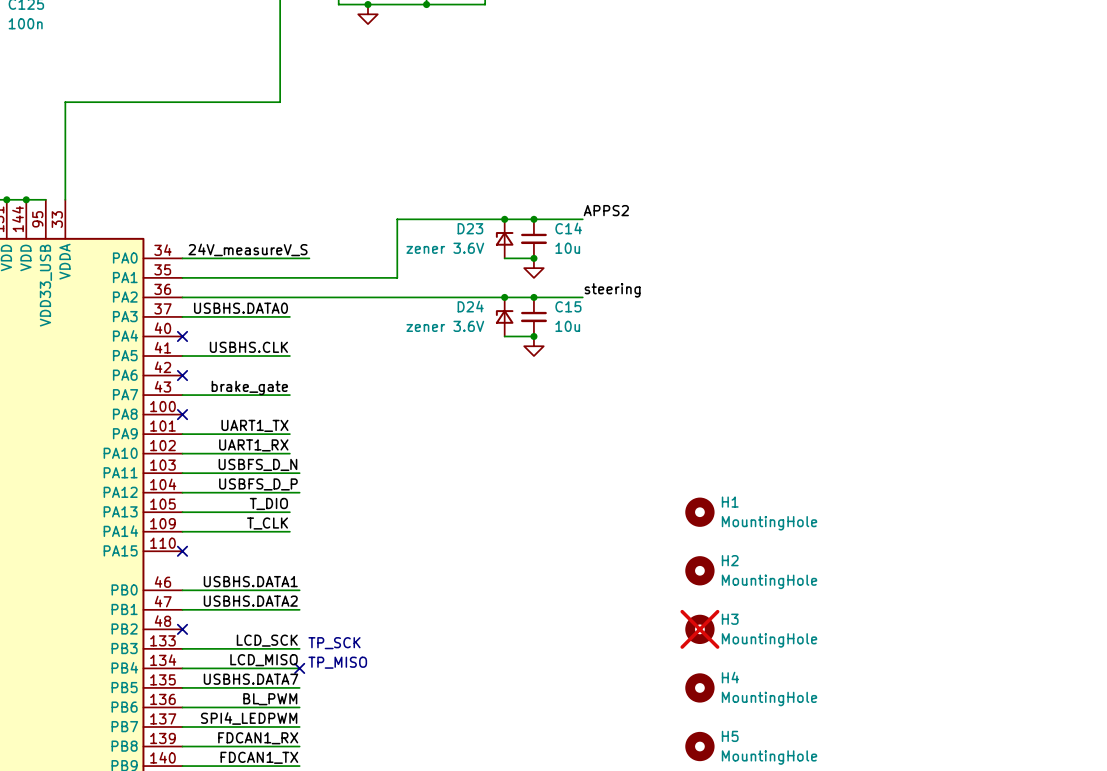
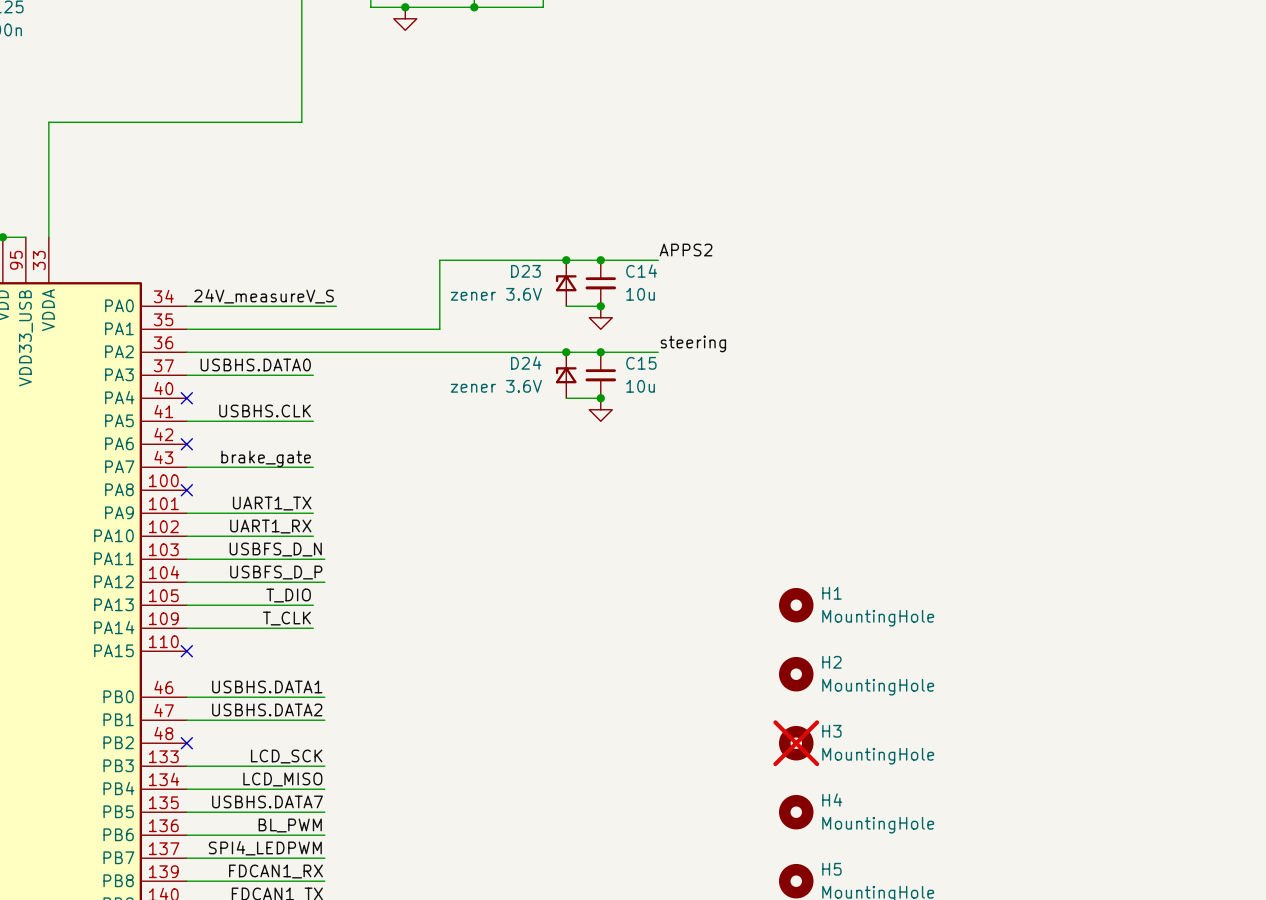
text: TP_SCK (334, 643) -> none
text: TP_MISO (337, 662) -> none
no-connect mark: (299, 668) -> none

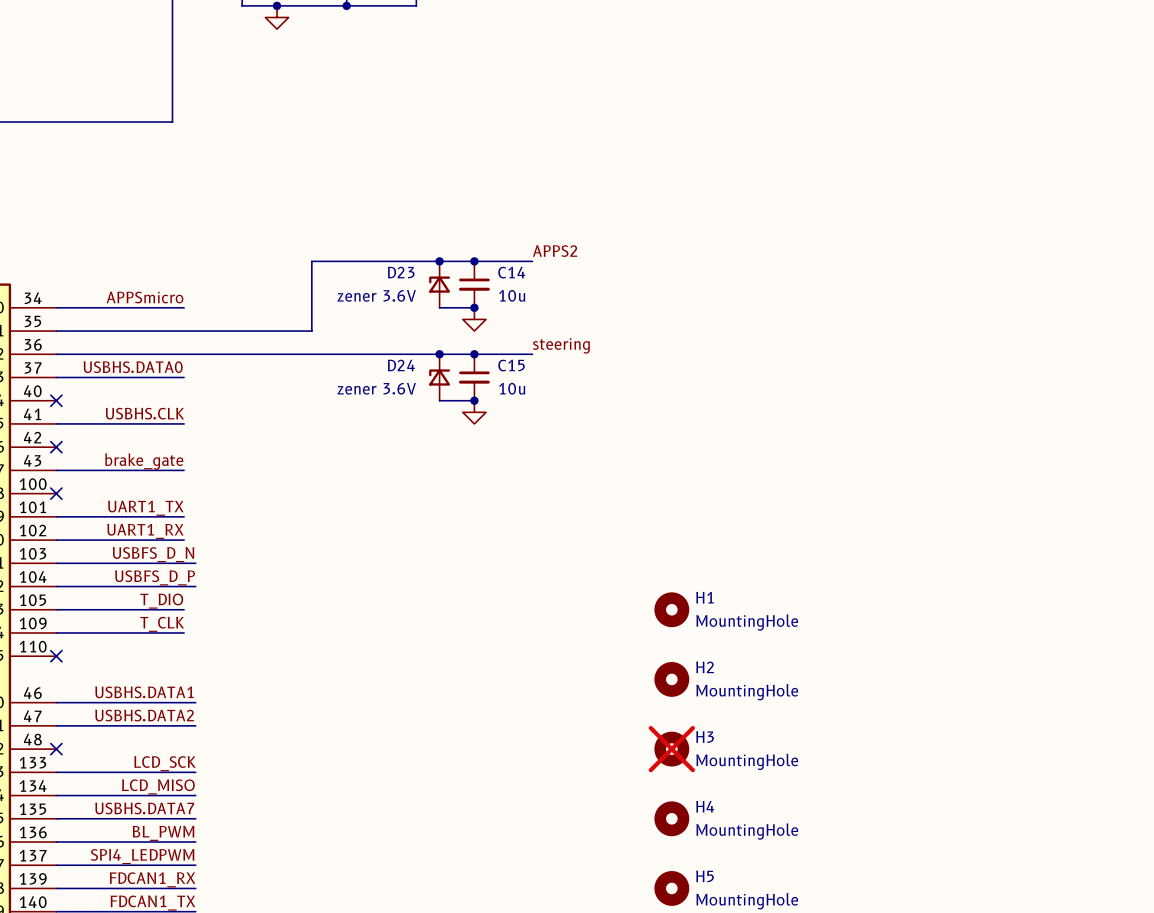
label: 24V_measureV_S (263, 296) -> none
label: none -> APPSmicro (144, 297)
wire: (313, 306) (336, 306) -> none

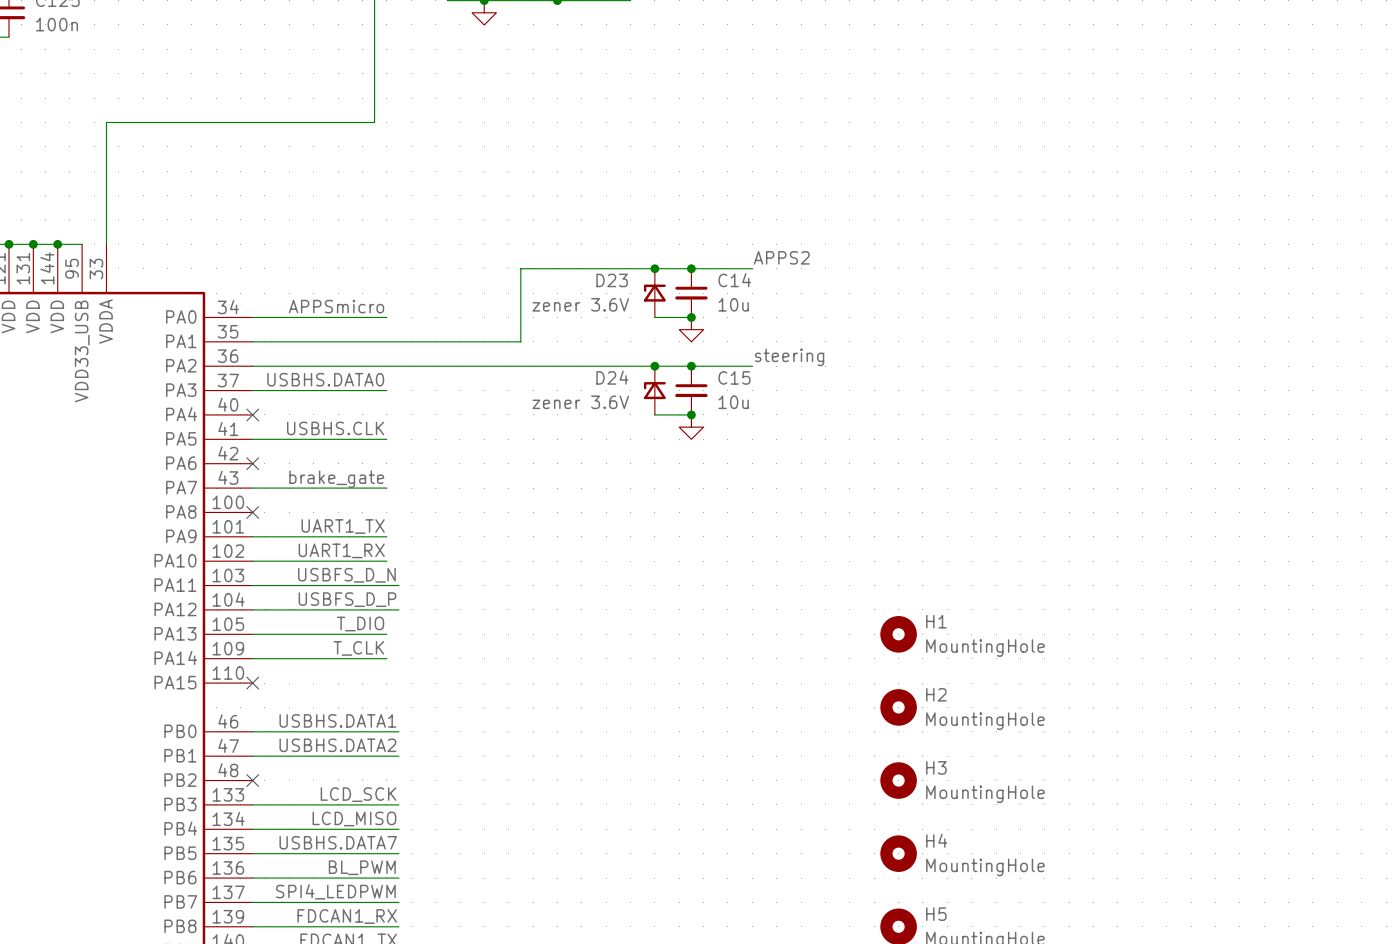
H3 do-not-place cross: (671, 749) -> none

